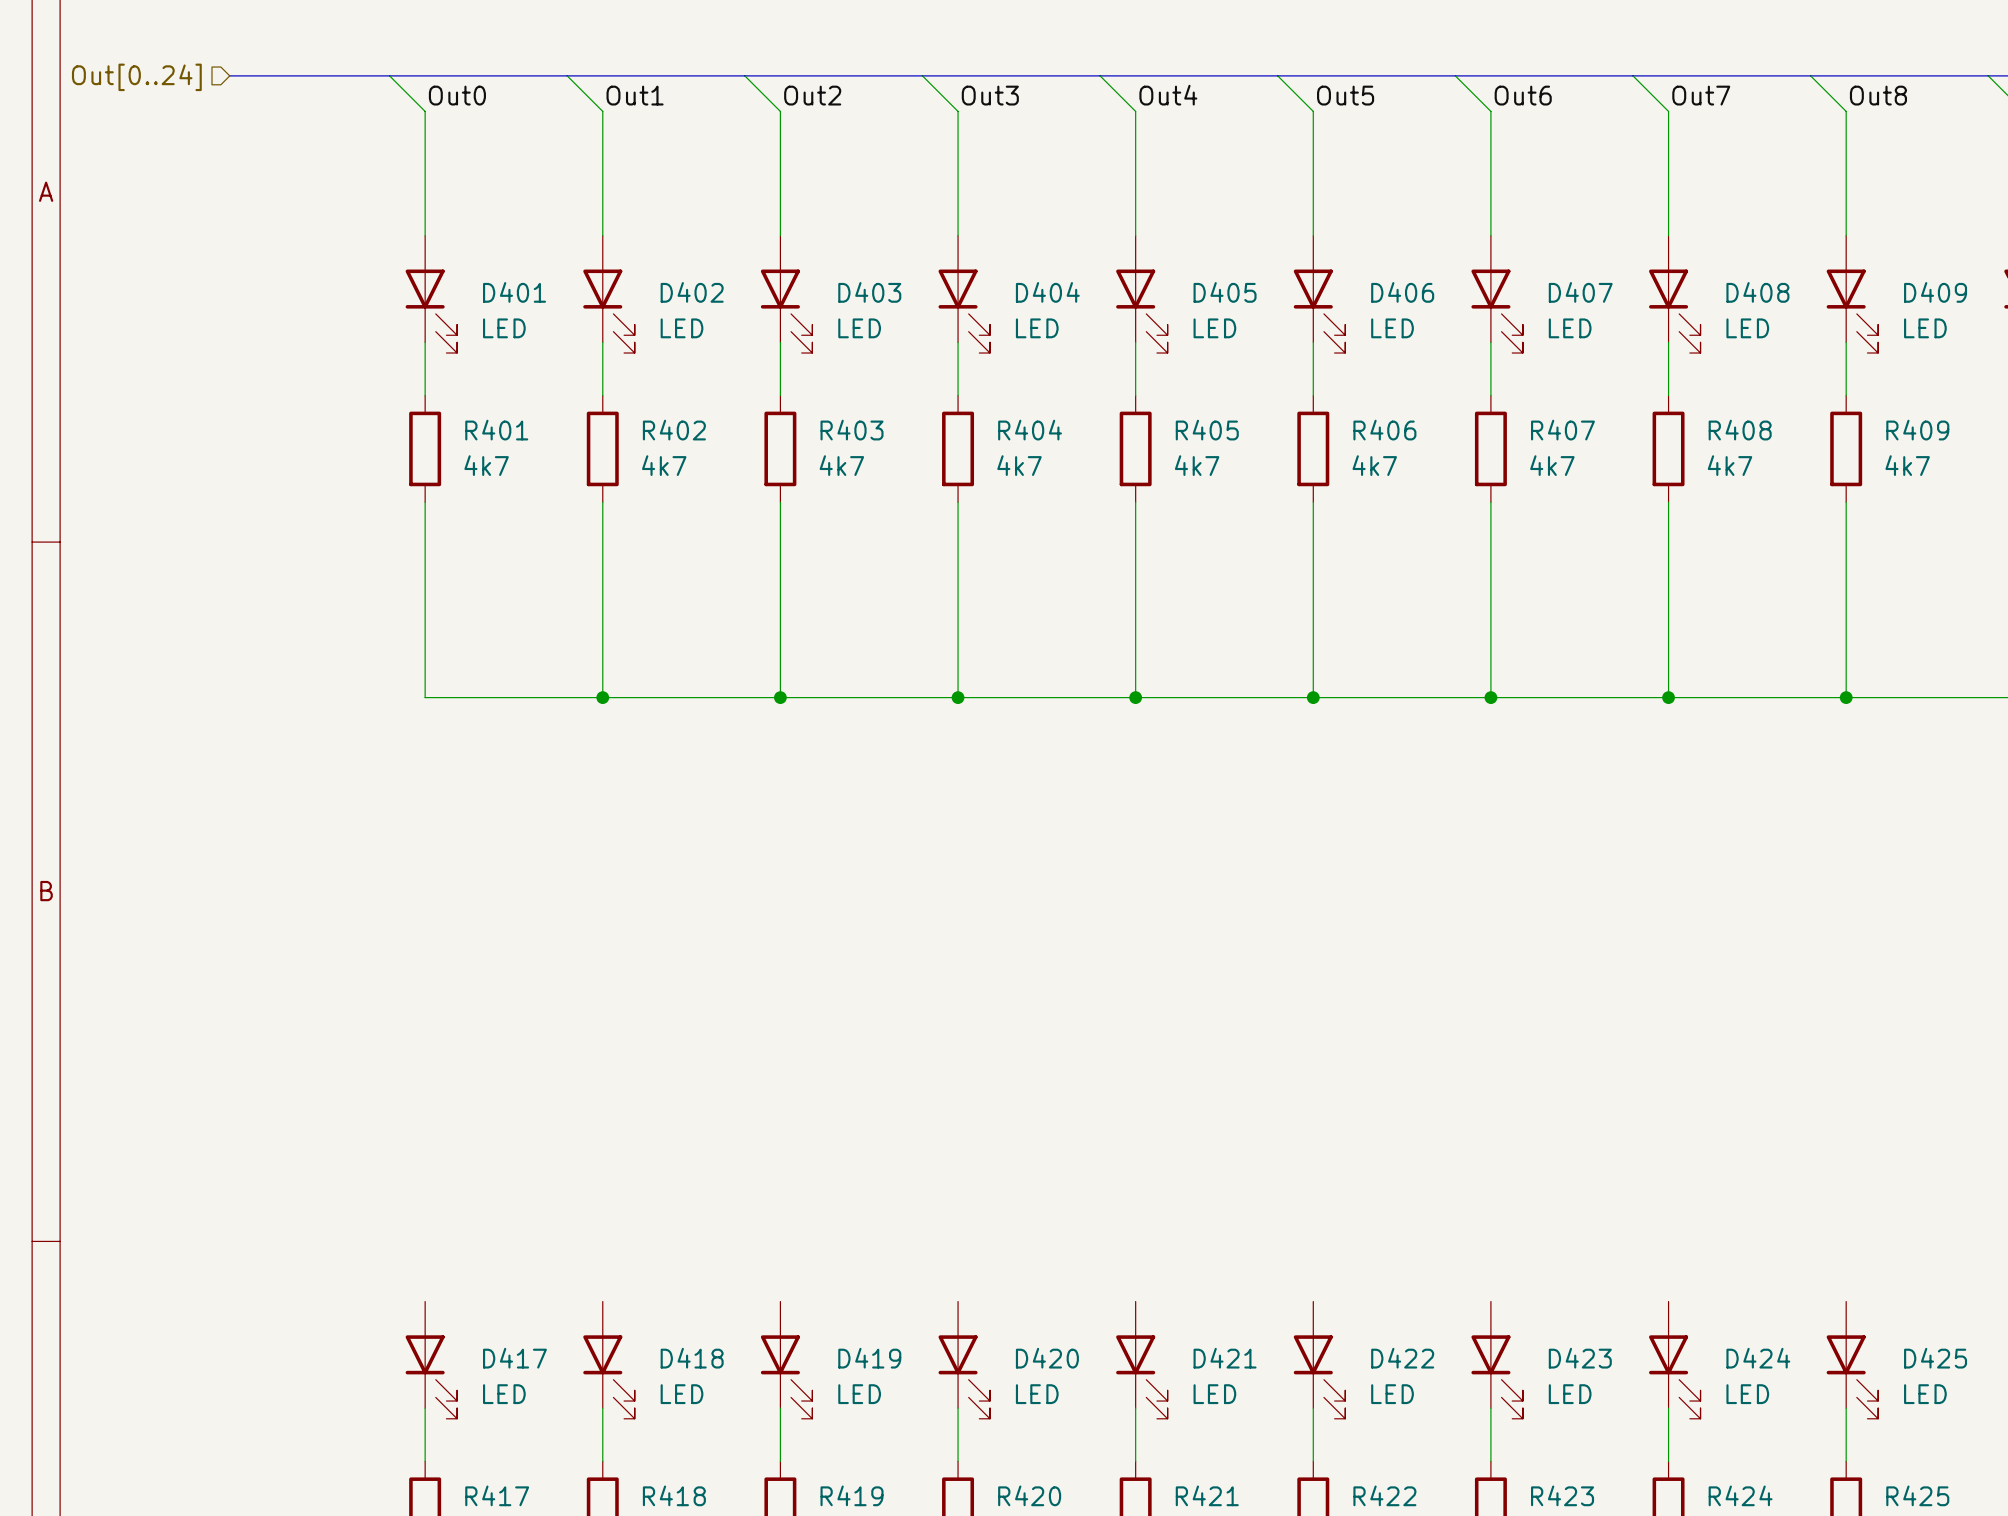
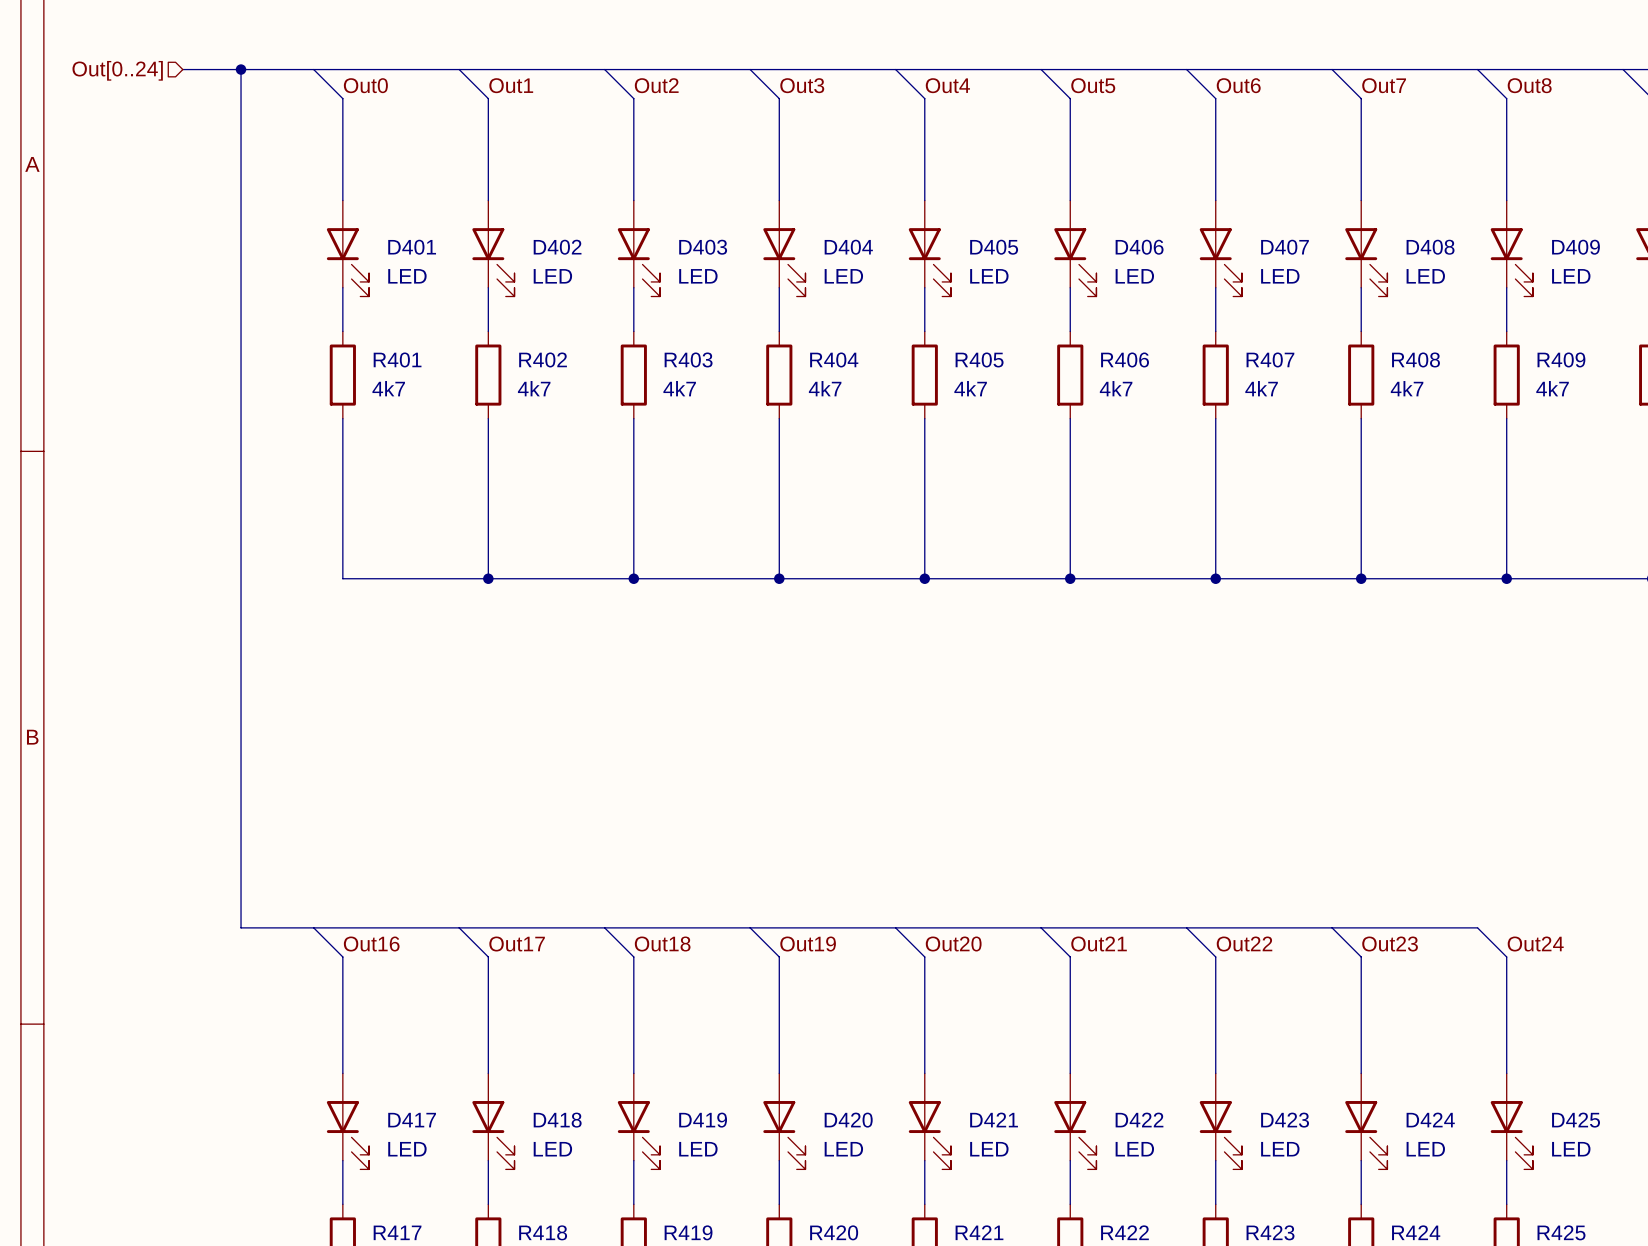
bus: none -> (241, 69) (241, 927) (1477, 927)
junction: none -> (241, 69)
wire: none -> (313, 927) (342, 956) (342, 1073)
wire: none -> (459, 927) (488, 956) (488, 1073)
wire: none -> (604, 927) (633, 956) (633, 1073)
wire: none -> (750, 927) (779, 956) (779, 1073)
wire: none -> (895, 927) (924, 956) (924, 1073)
wire: none -> (1041, 927) (1070, 956) (1070, 1073)
wire: none -> (1186, 927) (1215, 956) (1215, 1073)
wire: none -> (1332, 927) (1361, 956) (1361, 1073)
wire: none -> (1477, 927) (1506, 956) (1506, 1073)
label: none -> Out16 (371, 944)
label: none -> Out17 (517, 944)
label: none -> Out18 (662, 944)
label: none -> Out19 (808, 944)
label: none -> Out20 (953, 944)
label: none -> Out21 (1099, 944)
label: none -> Out22 (1244, 944)
label: none -> Out23 (1390, 944)
label: none -> Out24 (1535, 944)

